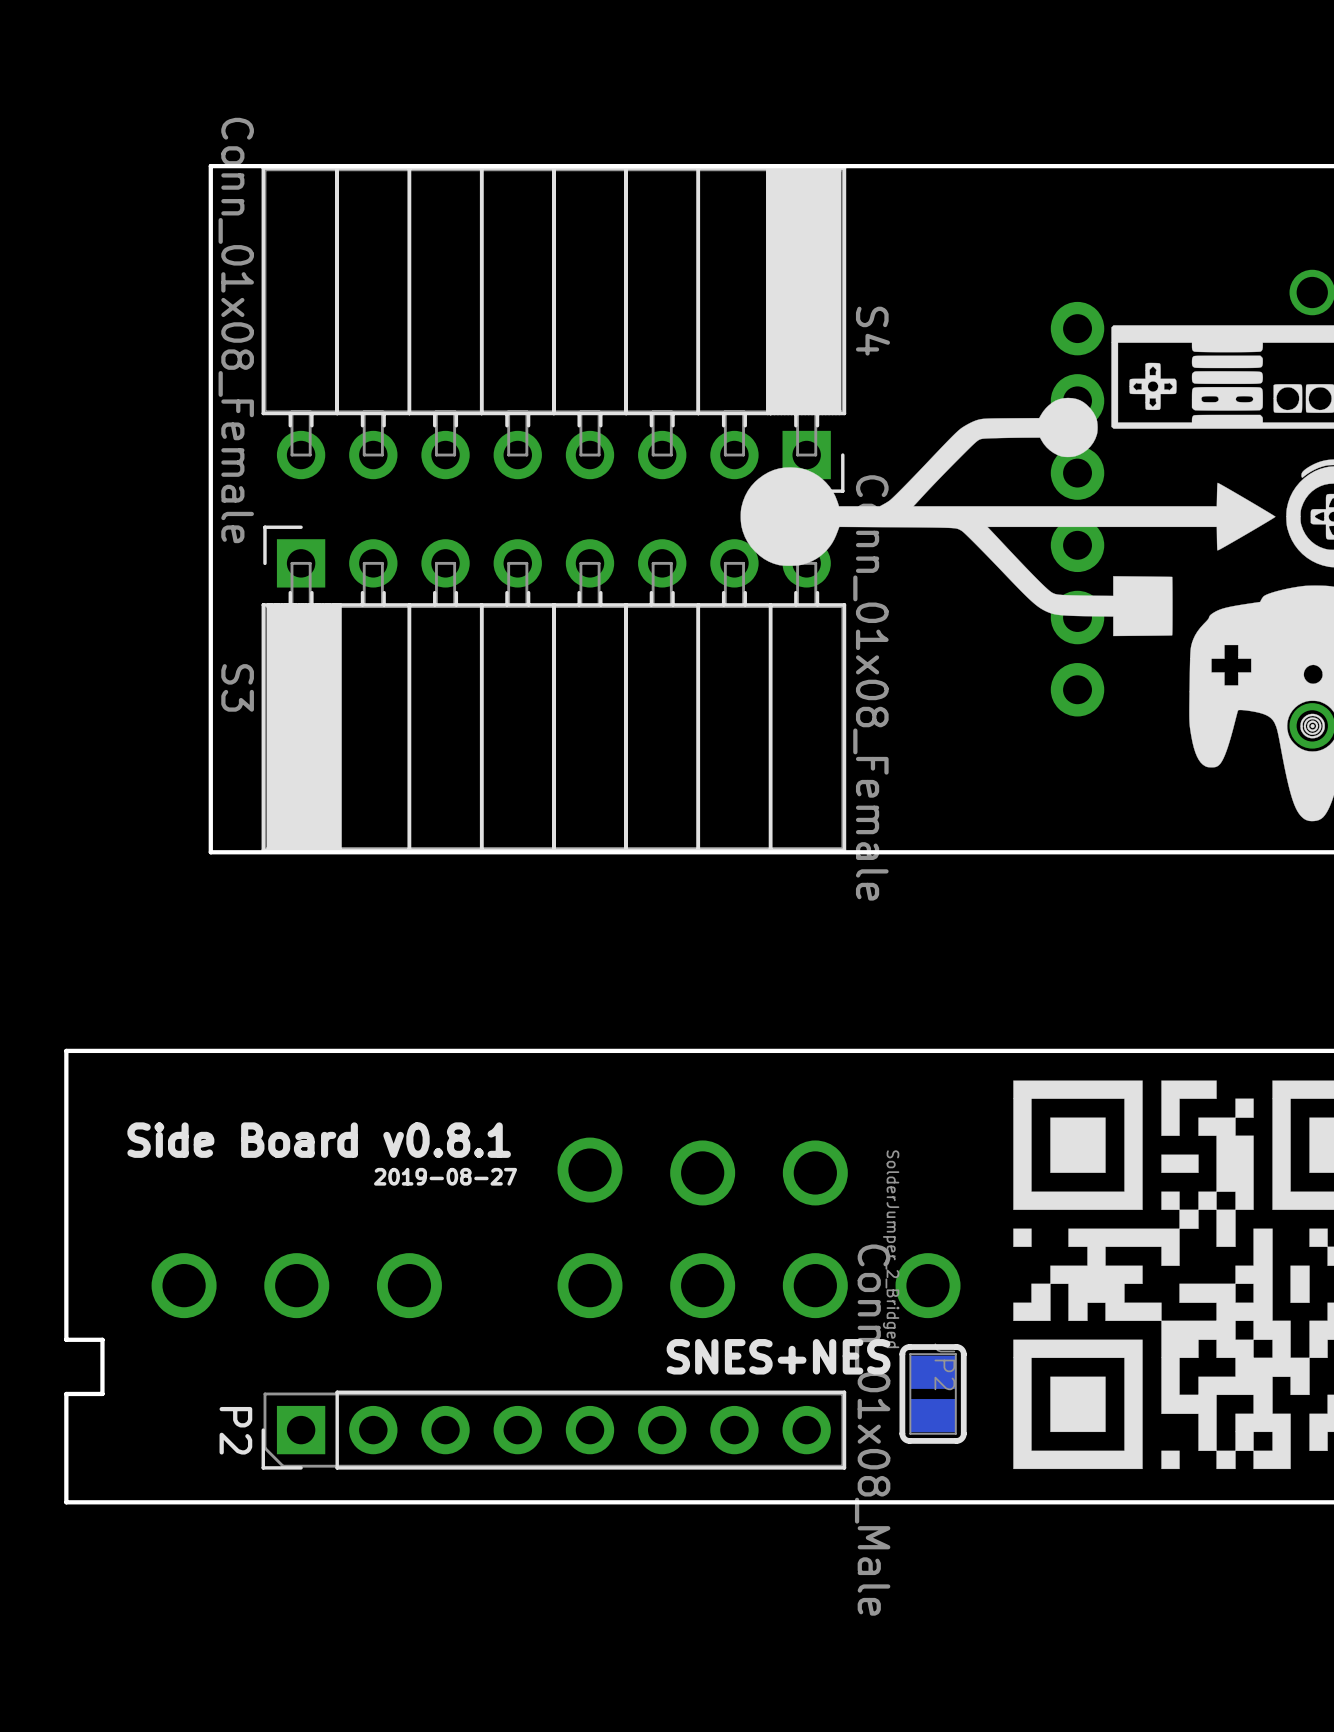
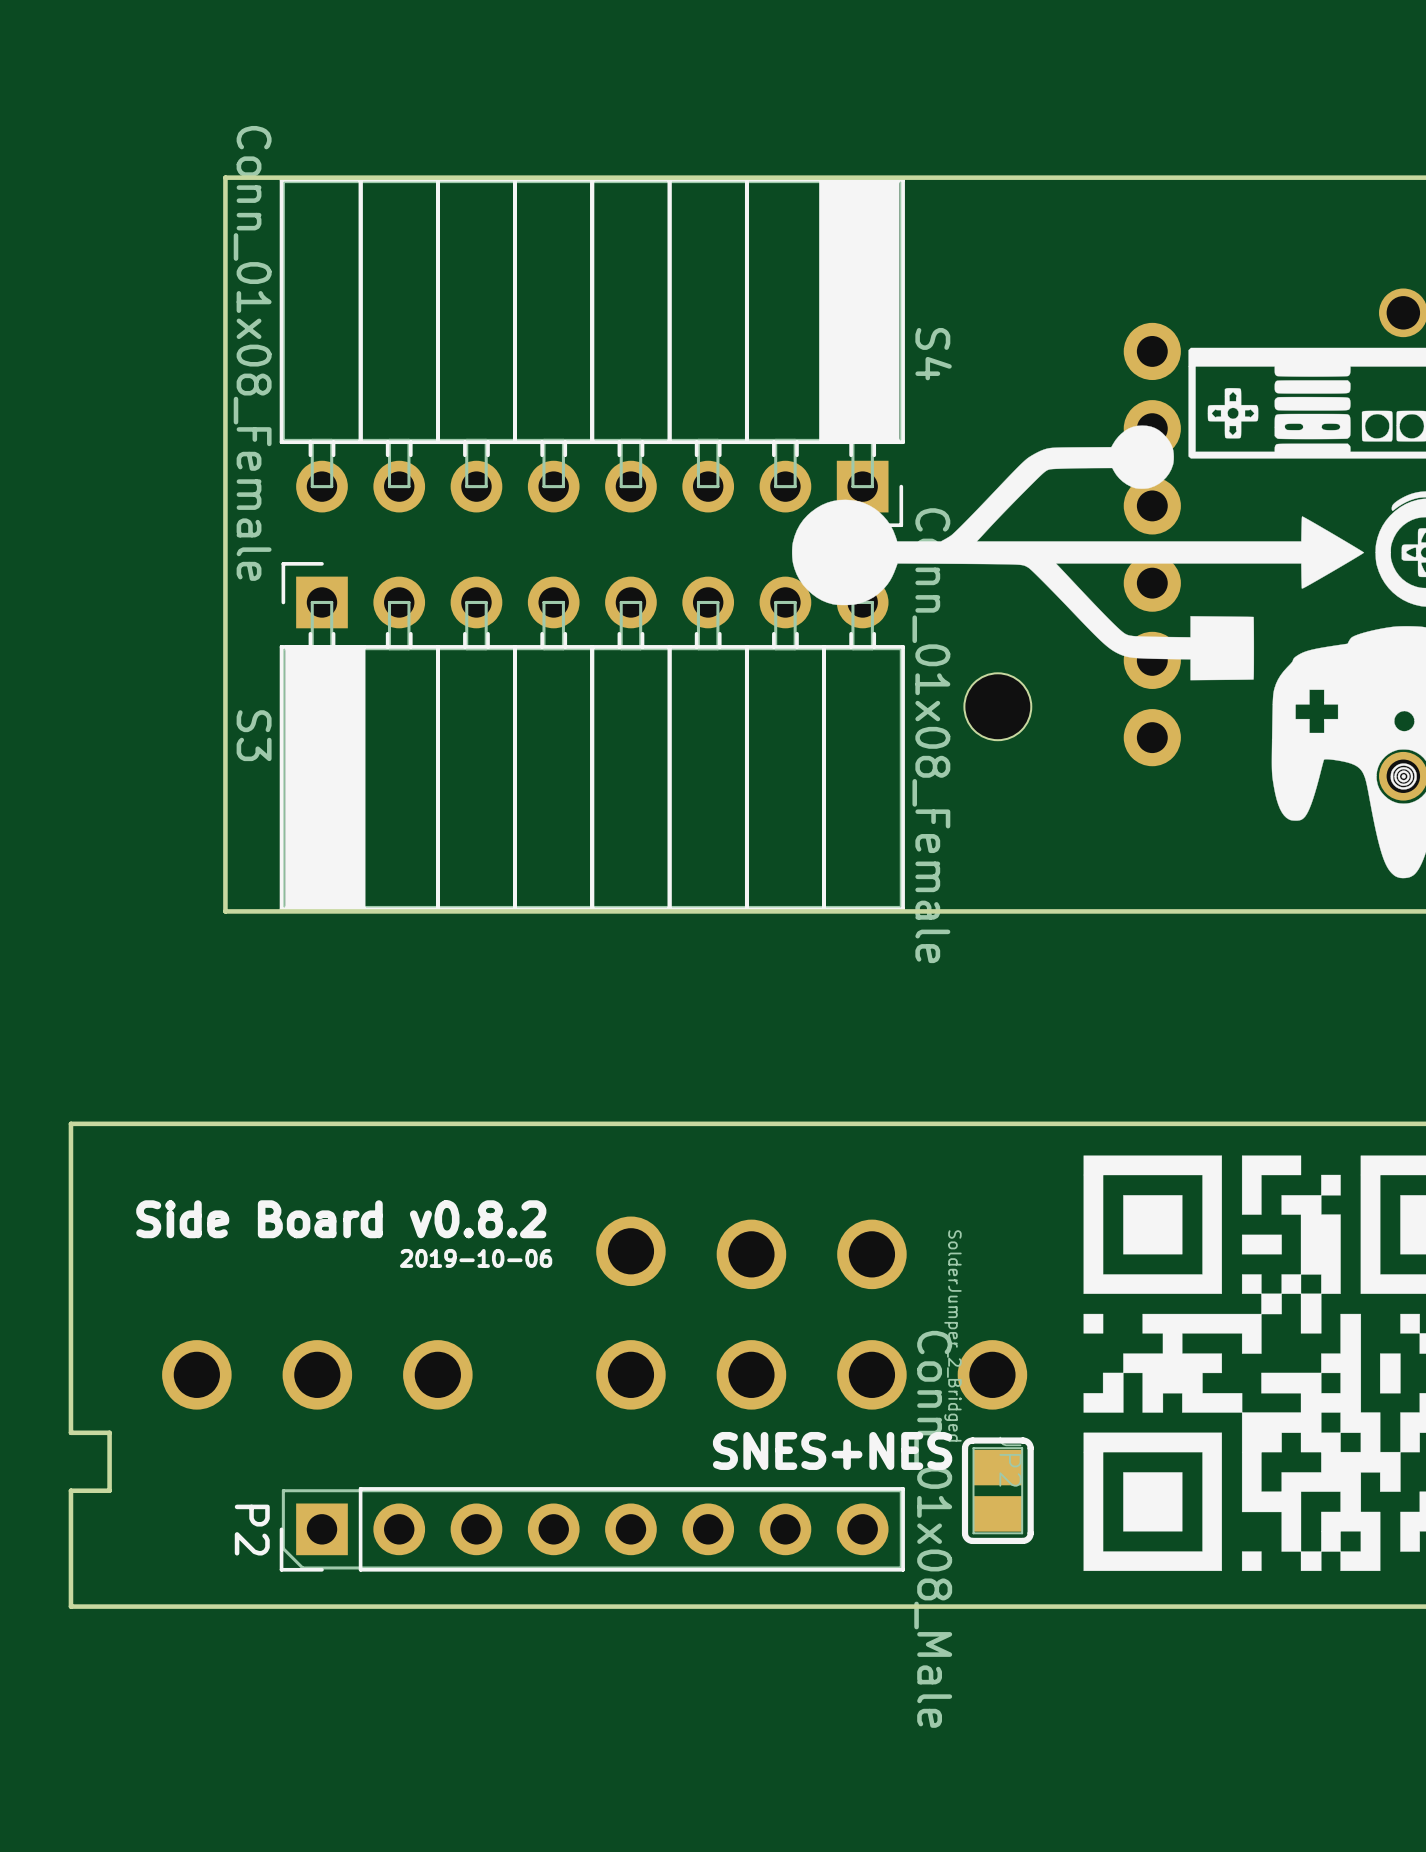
part: none -> (997, 706)
text: Side Board v0.8.1 (319, 1140) -> Side Board v0.8.2 (341, 1219)
text: 2019-08-27 (445, 1176) -> 2019-10-06 (476, 1258)

